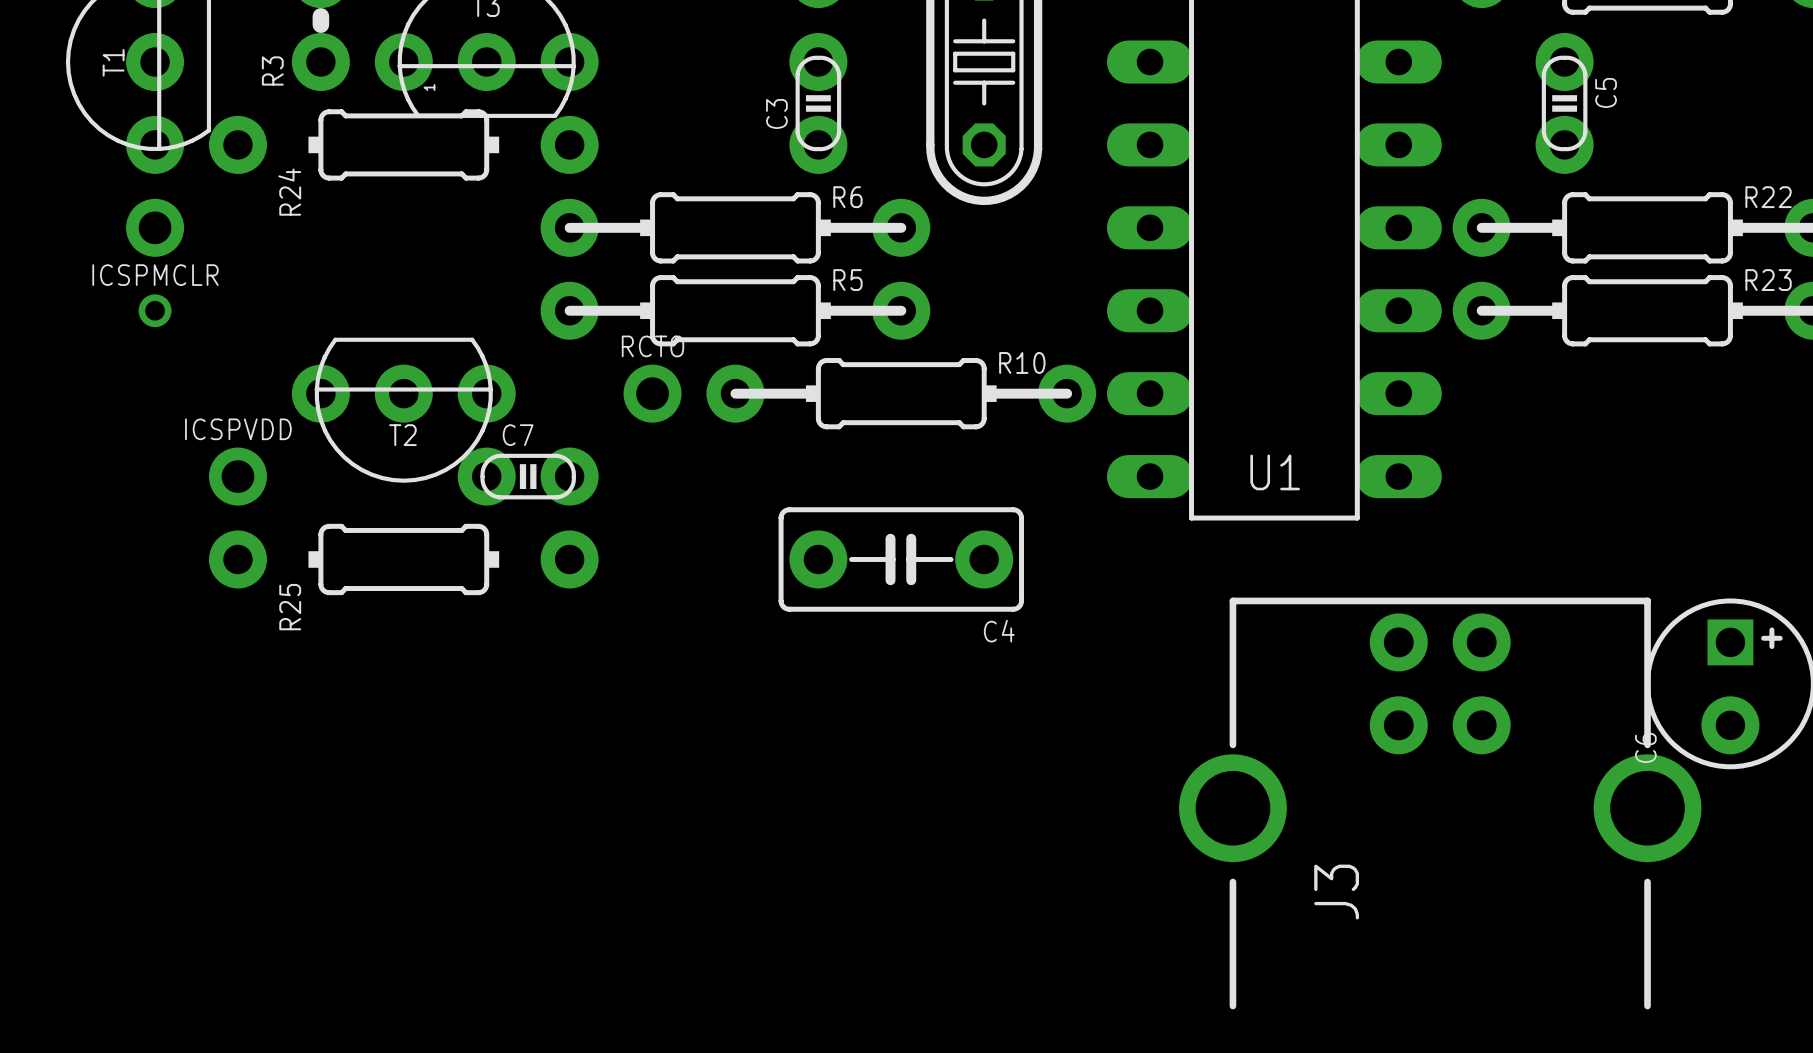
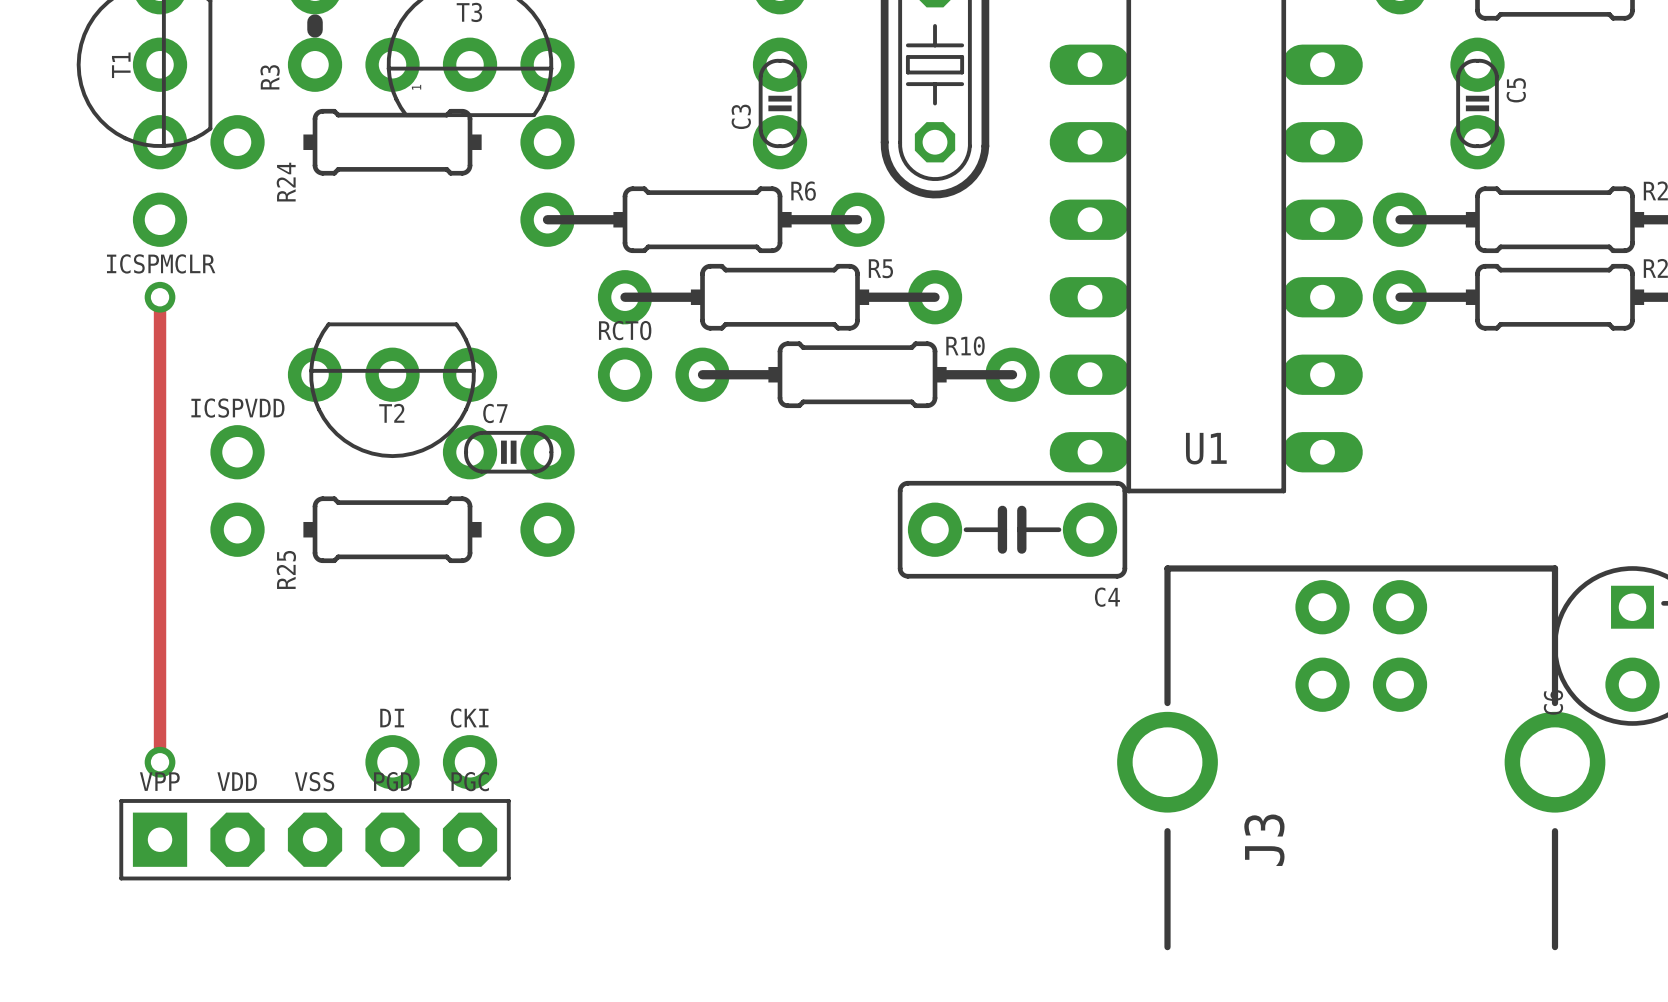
track: none -> (160, 297) (160, 762)
R5 position: (735, 310) -> (780, 297)
C4 position: (901, 559) -> (1012, 529)
via: none -> (160, 762)
DI: none -> (392, 762)
CKI: none -> (470, 762)
part: none -> (315, 839)

